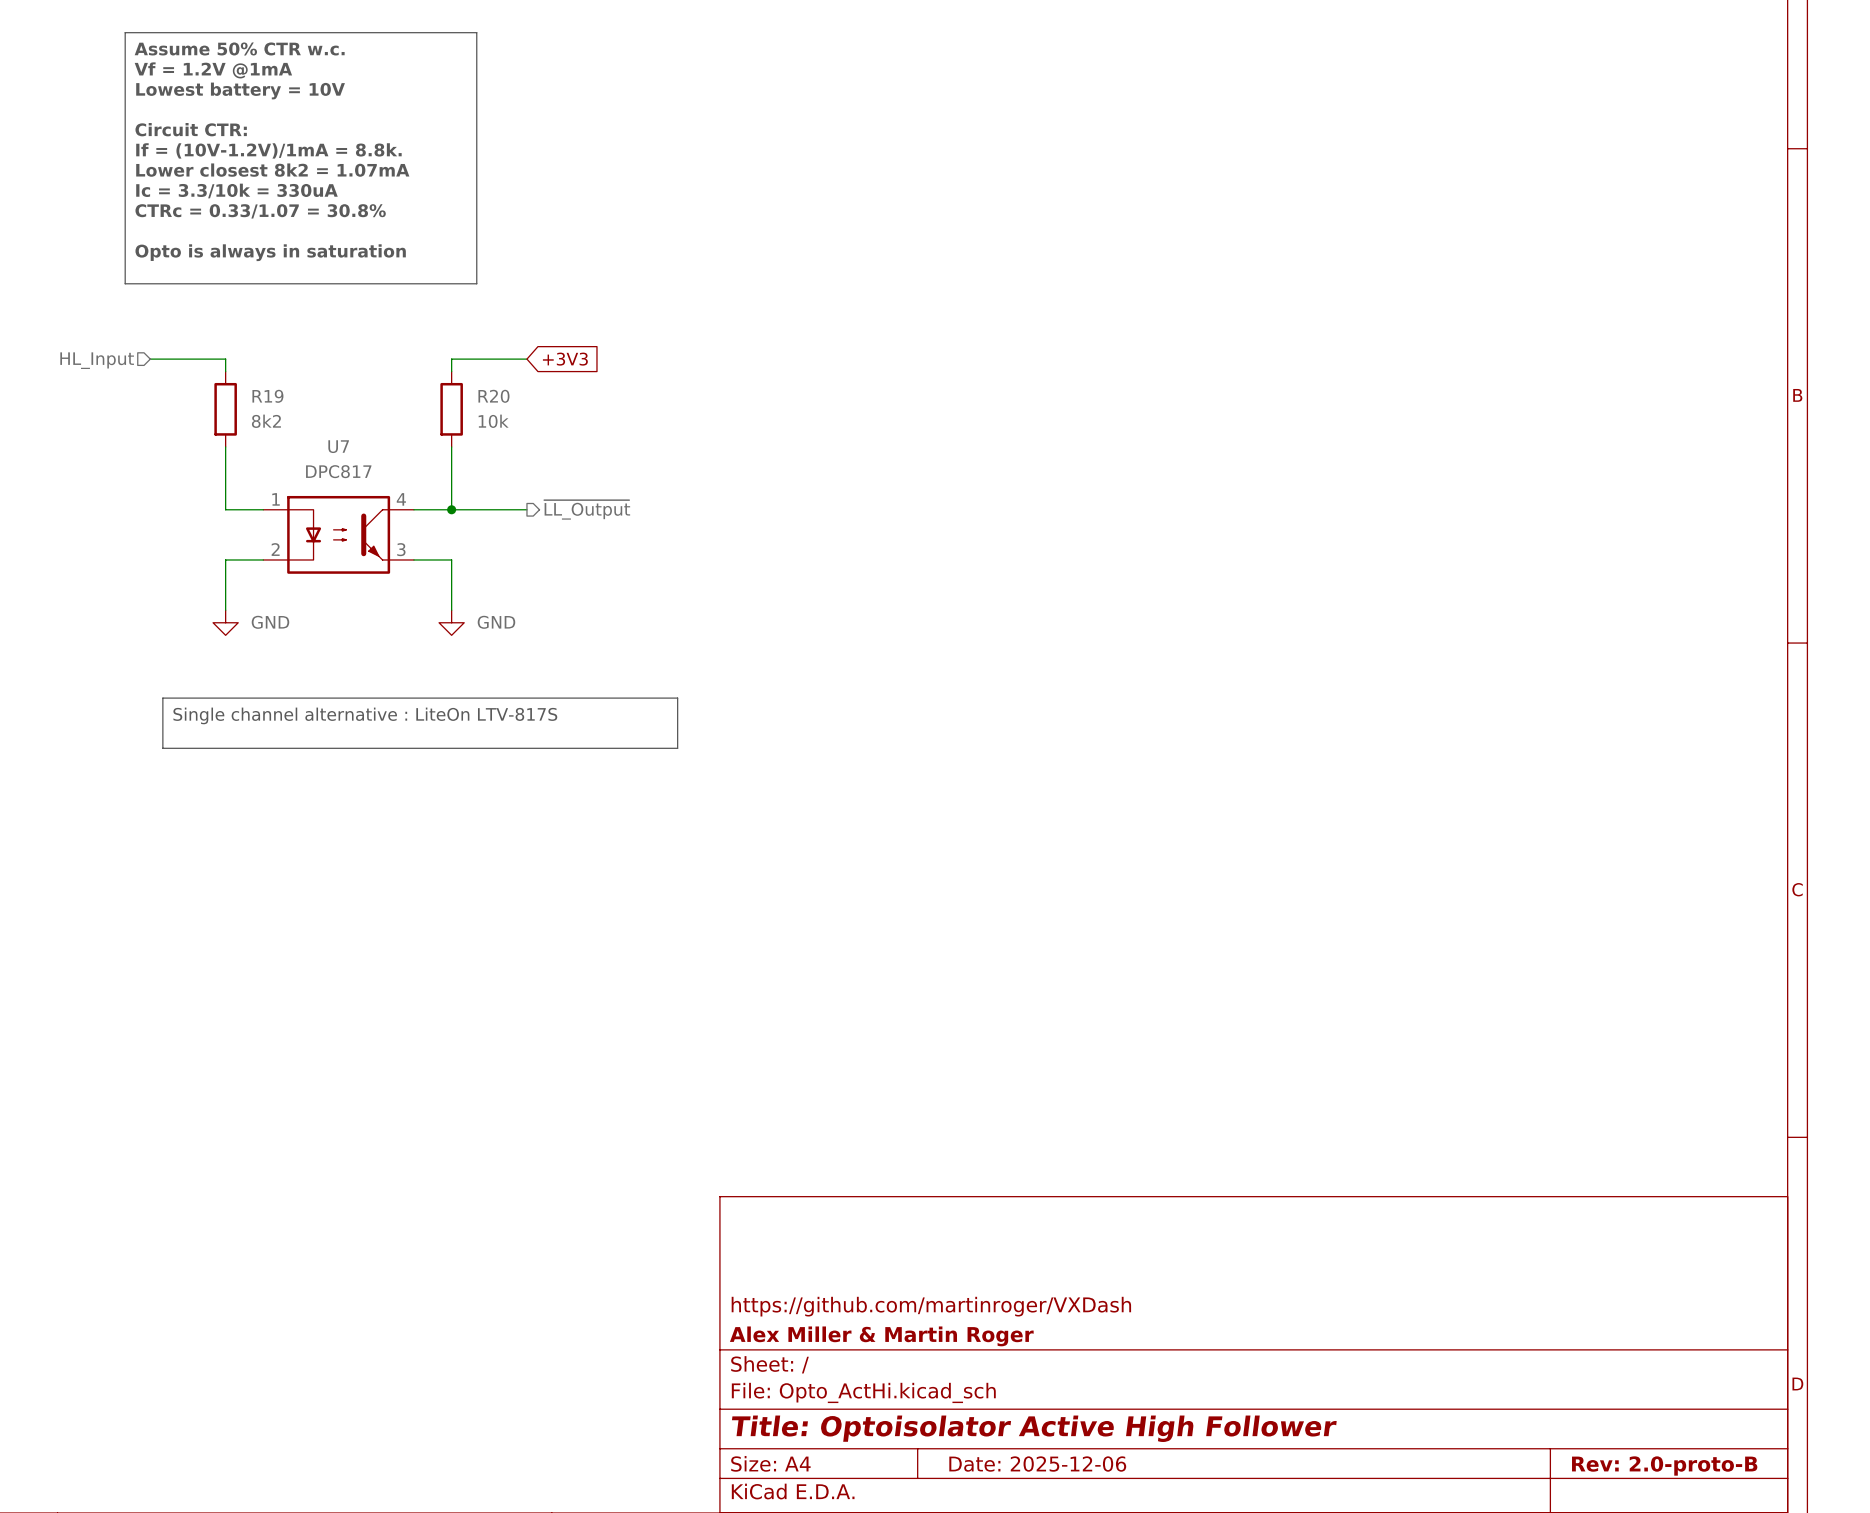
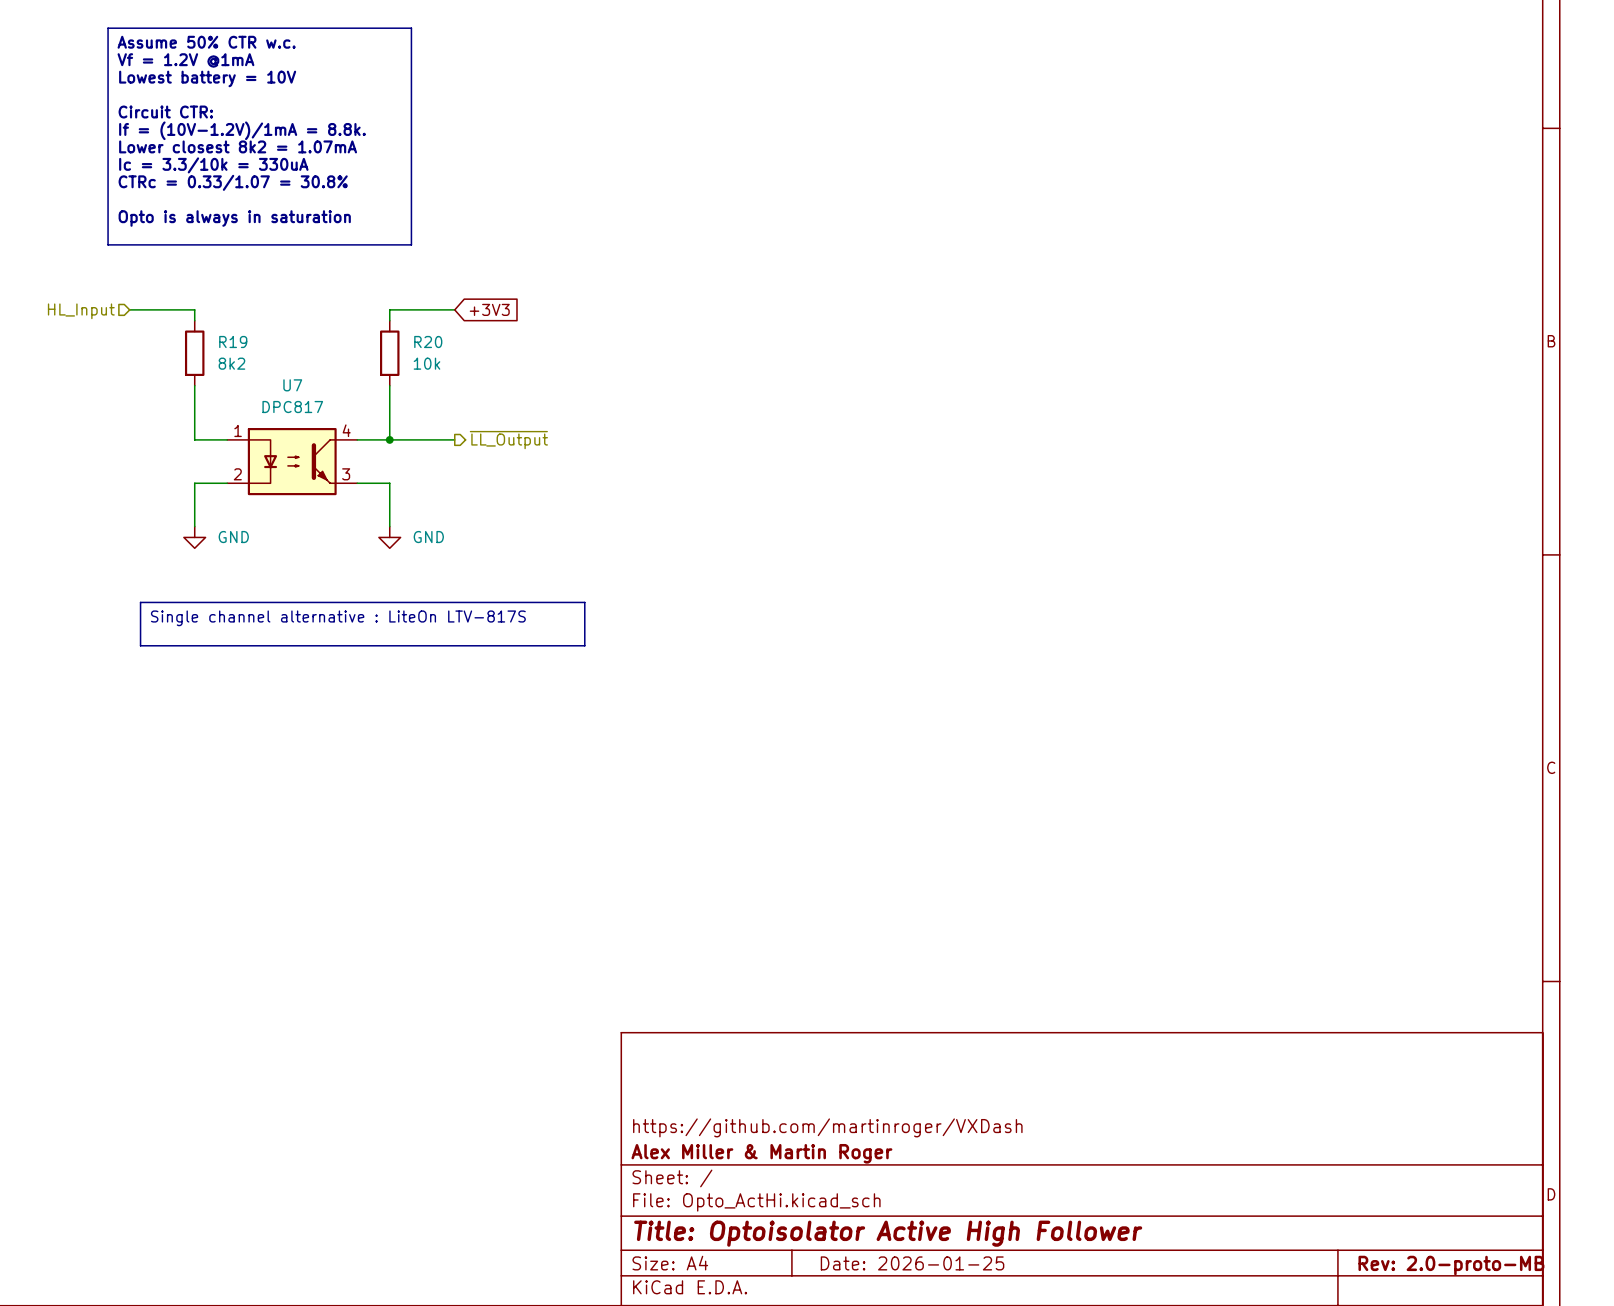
title block: Date: 2025-12-06 (1037, 1464) -> Date: 2026-01-25 (912, 1263)
title block: Rev: 2.0-proto-B (1664, 1465) -> Rev: 2.0-proto-MB (1451, 1265)

